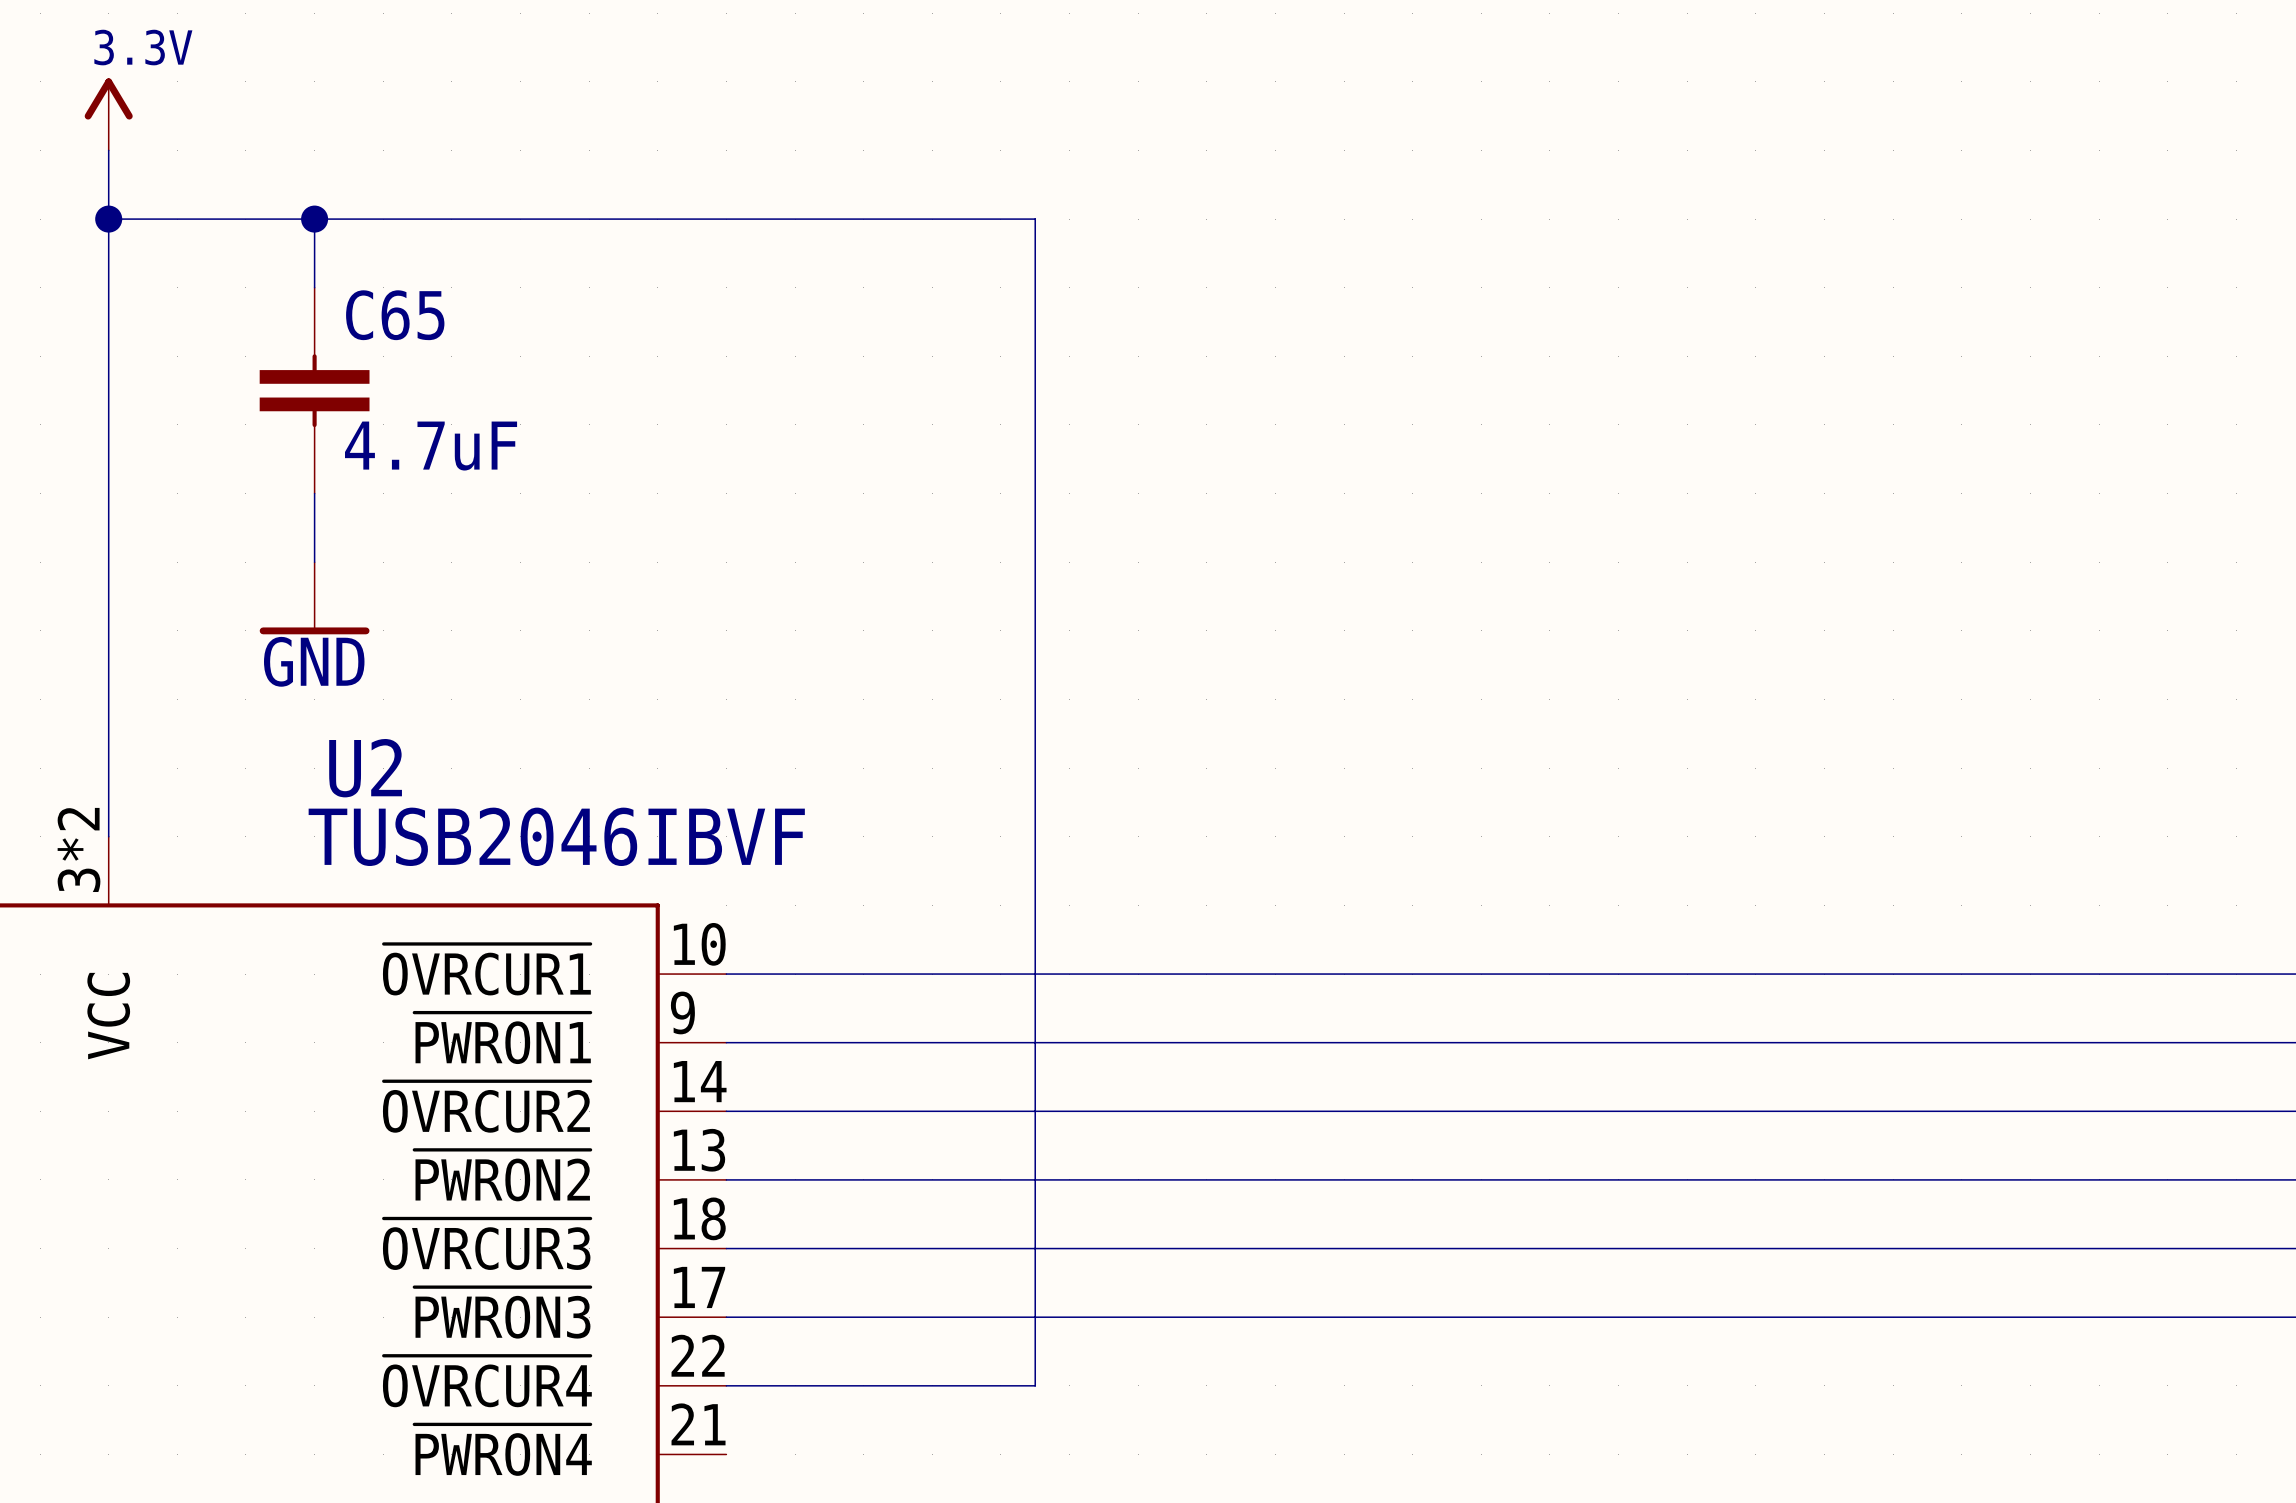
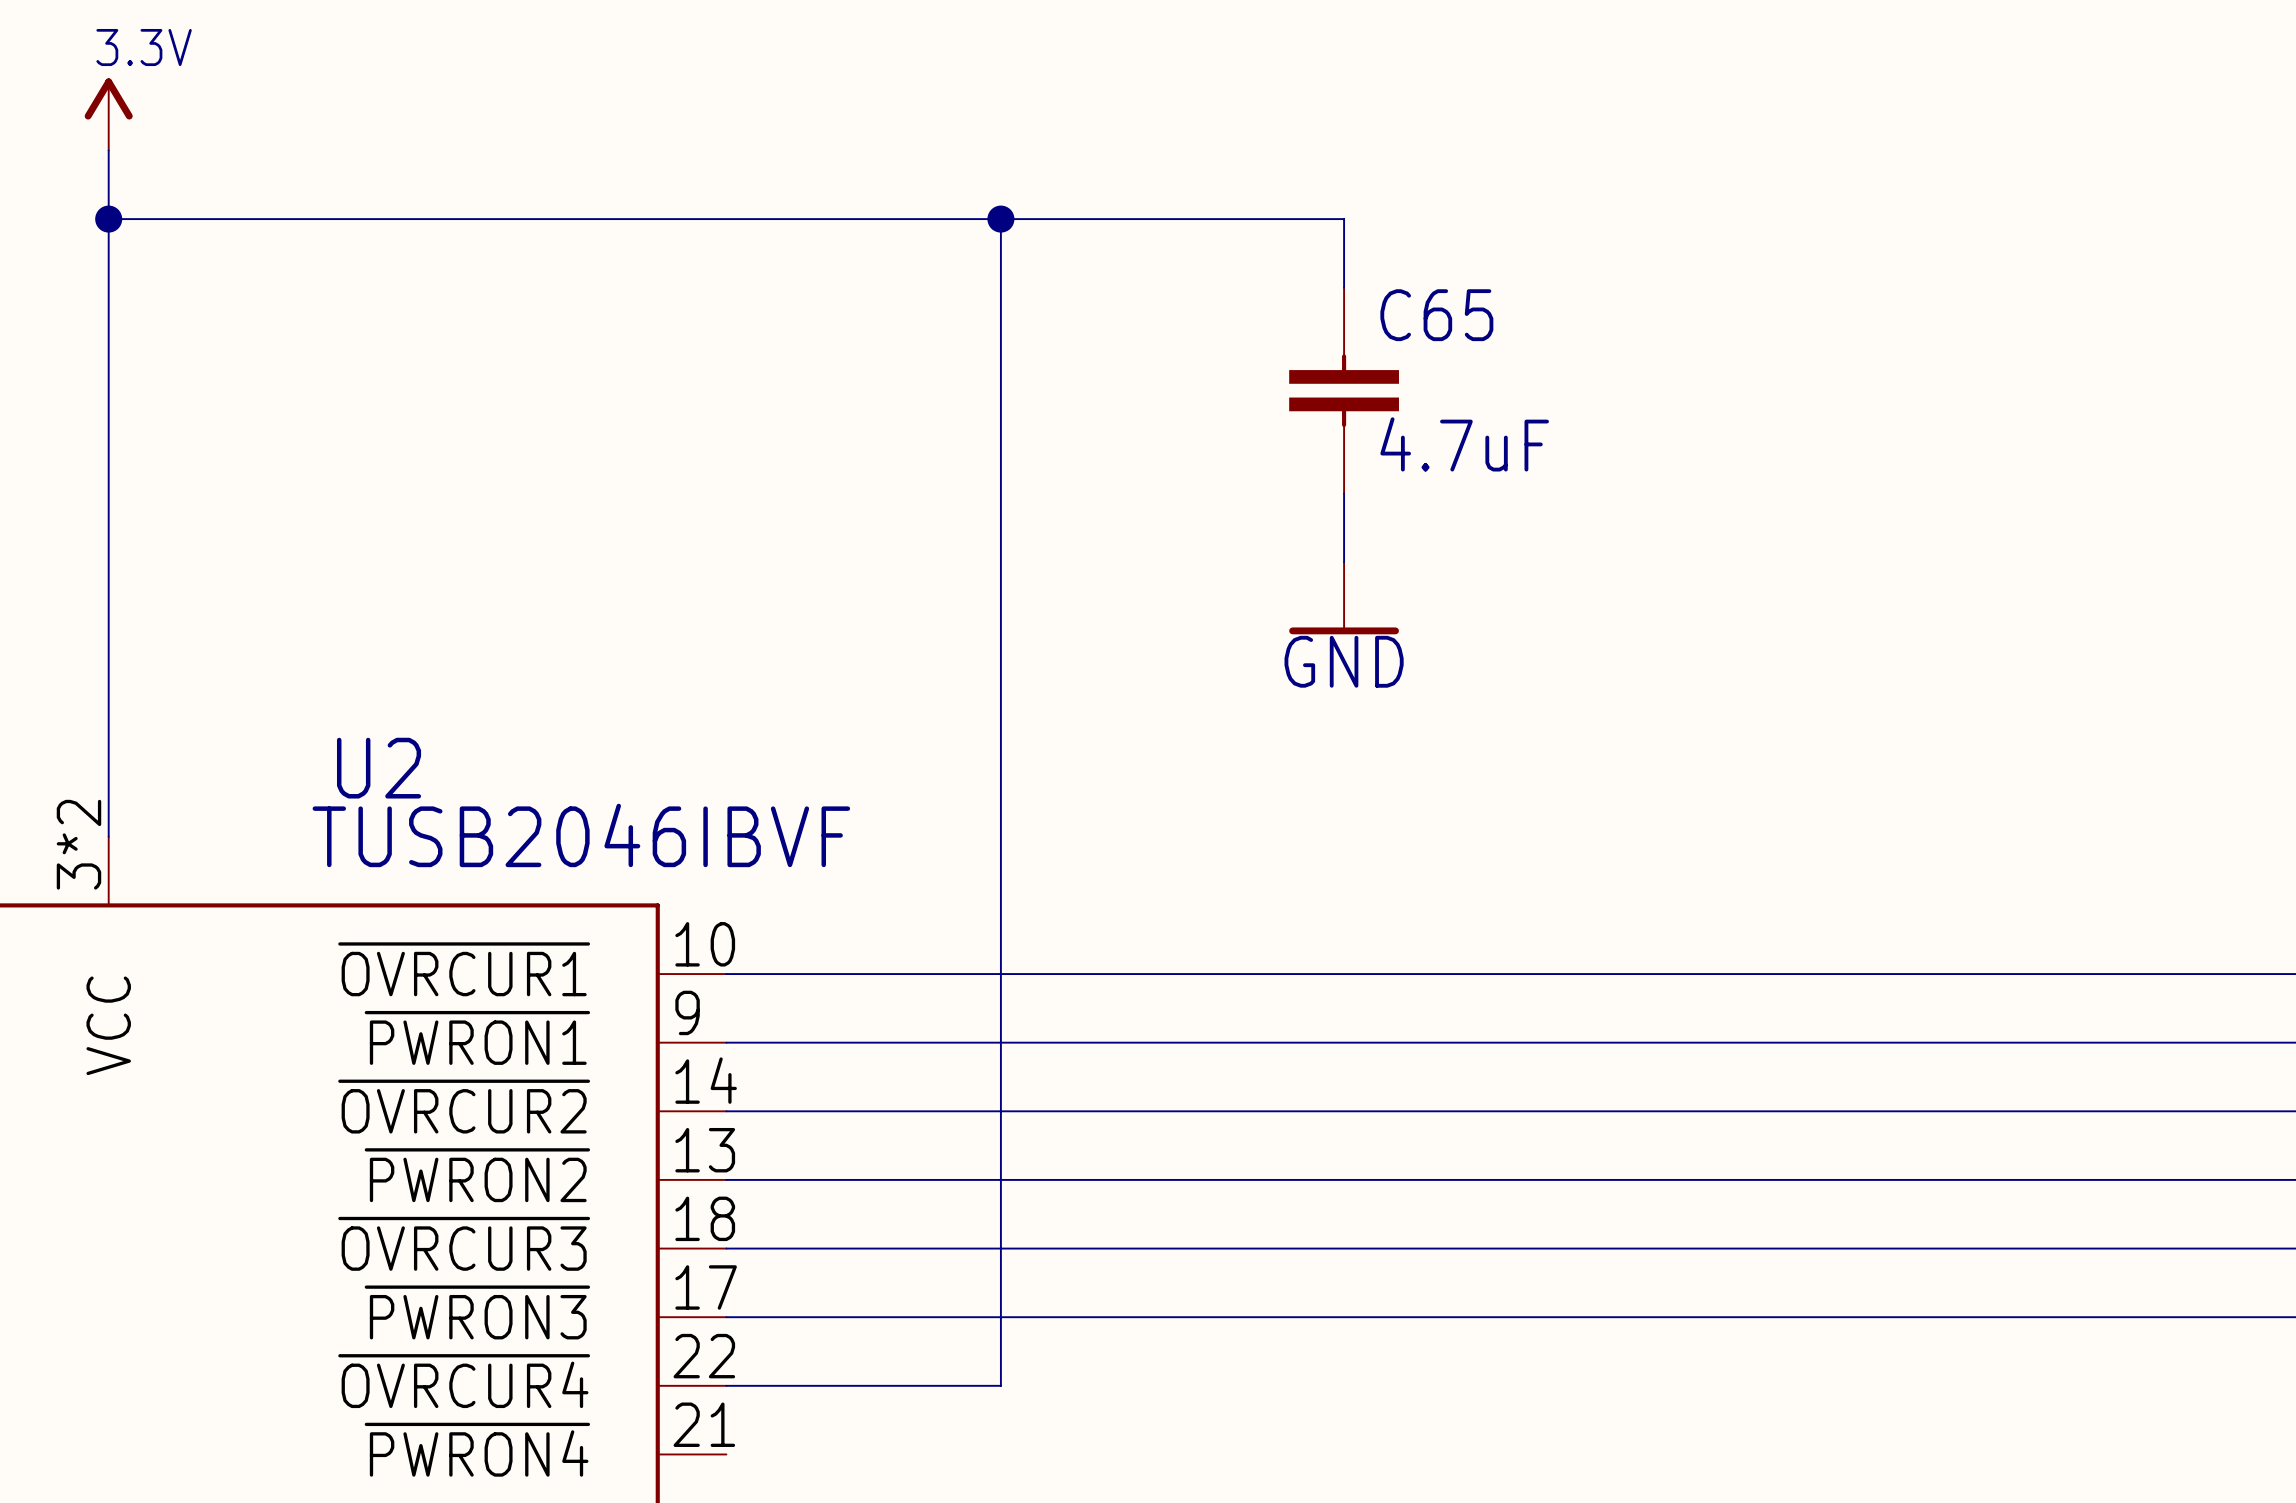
wire: (314, 219) (314, 287) -> none
junction: (314, 219) -> none
junction: none -> (1000, 219)
wire: (1035, 219) (1035, 1385) (1000, 1385) -> (1000, 219) (1000, 1385)
wire: none -> (1035, 219) (1344, 219) (1344, 287)
C65 position: (314, 390) -> (1344, 390)
wire: (314, 493) (314, 562) -> none
wire: none -> (1344, 493) (1344, 562)
power symbol: GND (314, 598) -> none
power symbol: none -> GND (1344, 598)

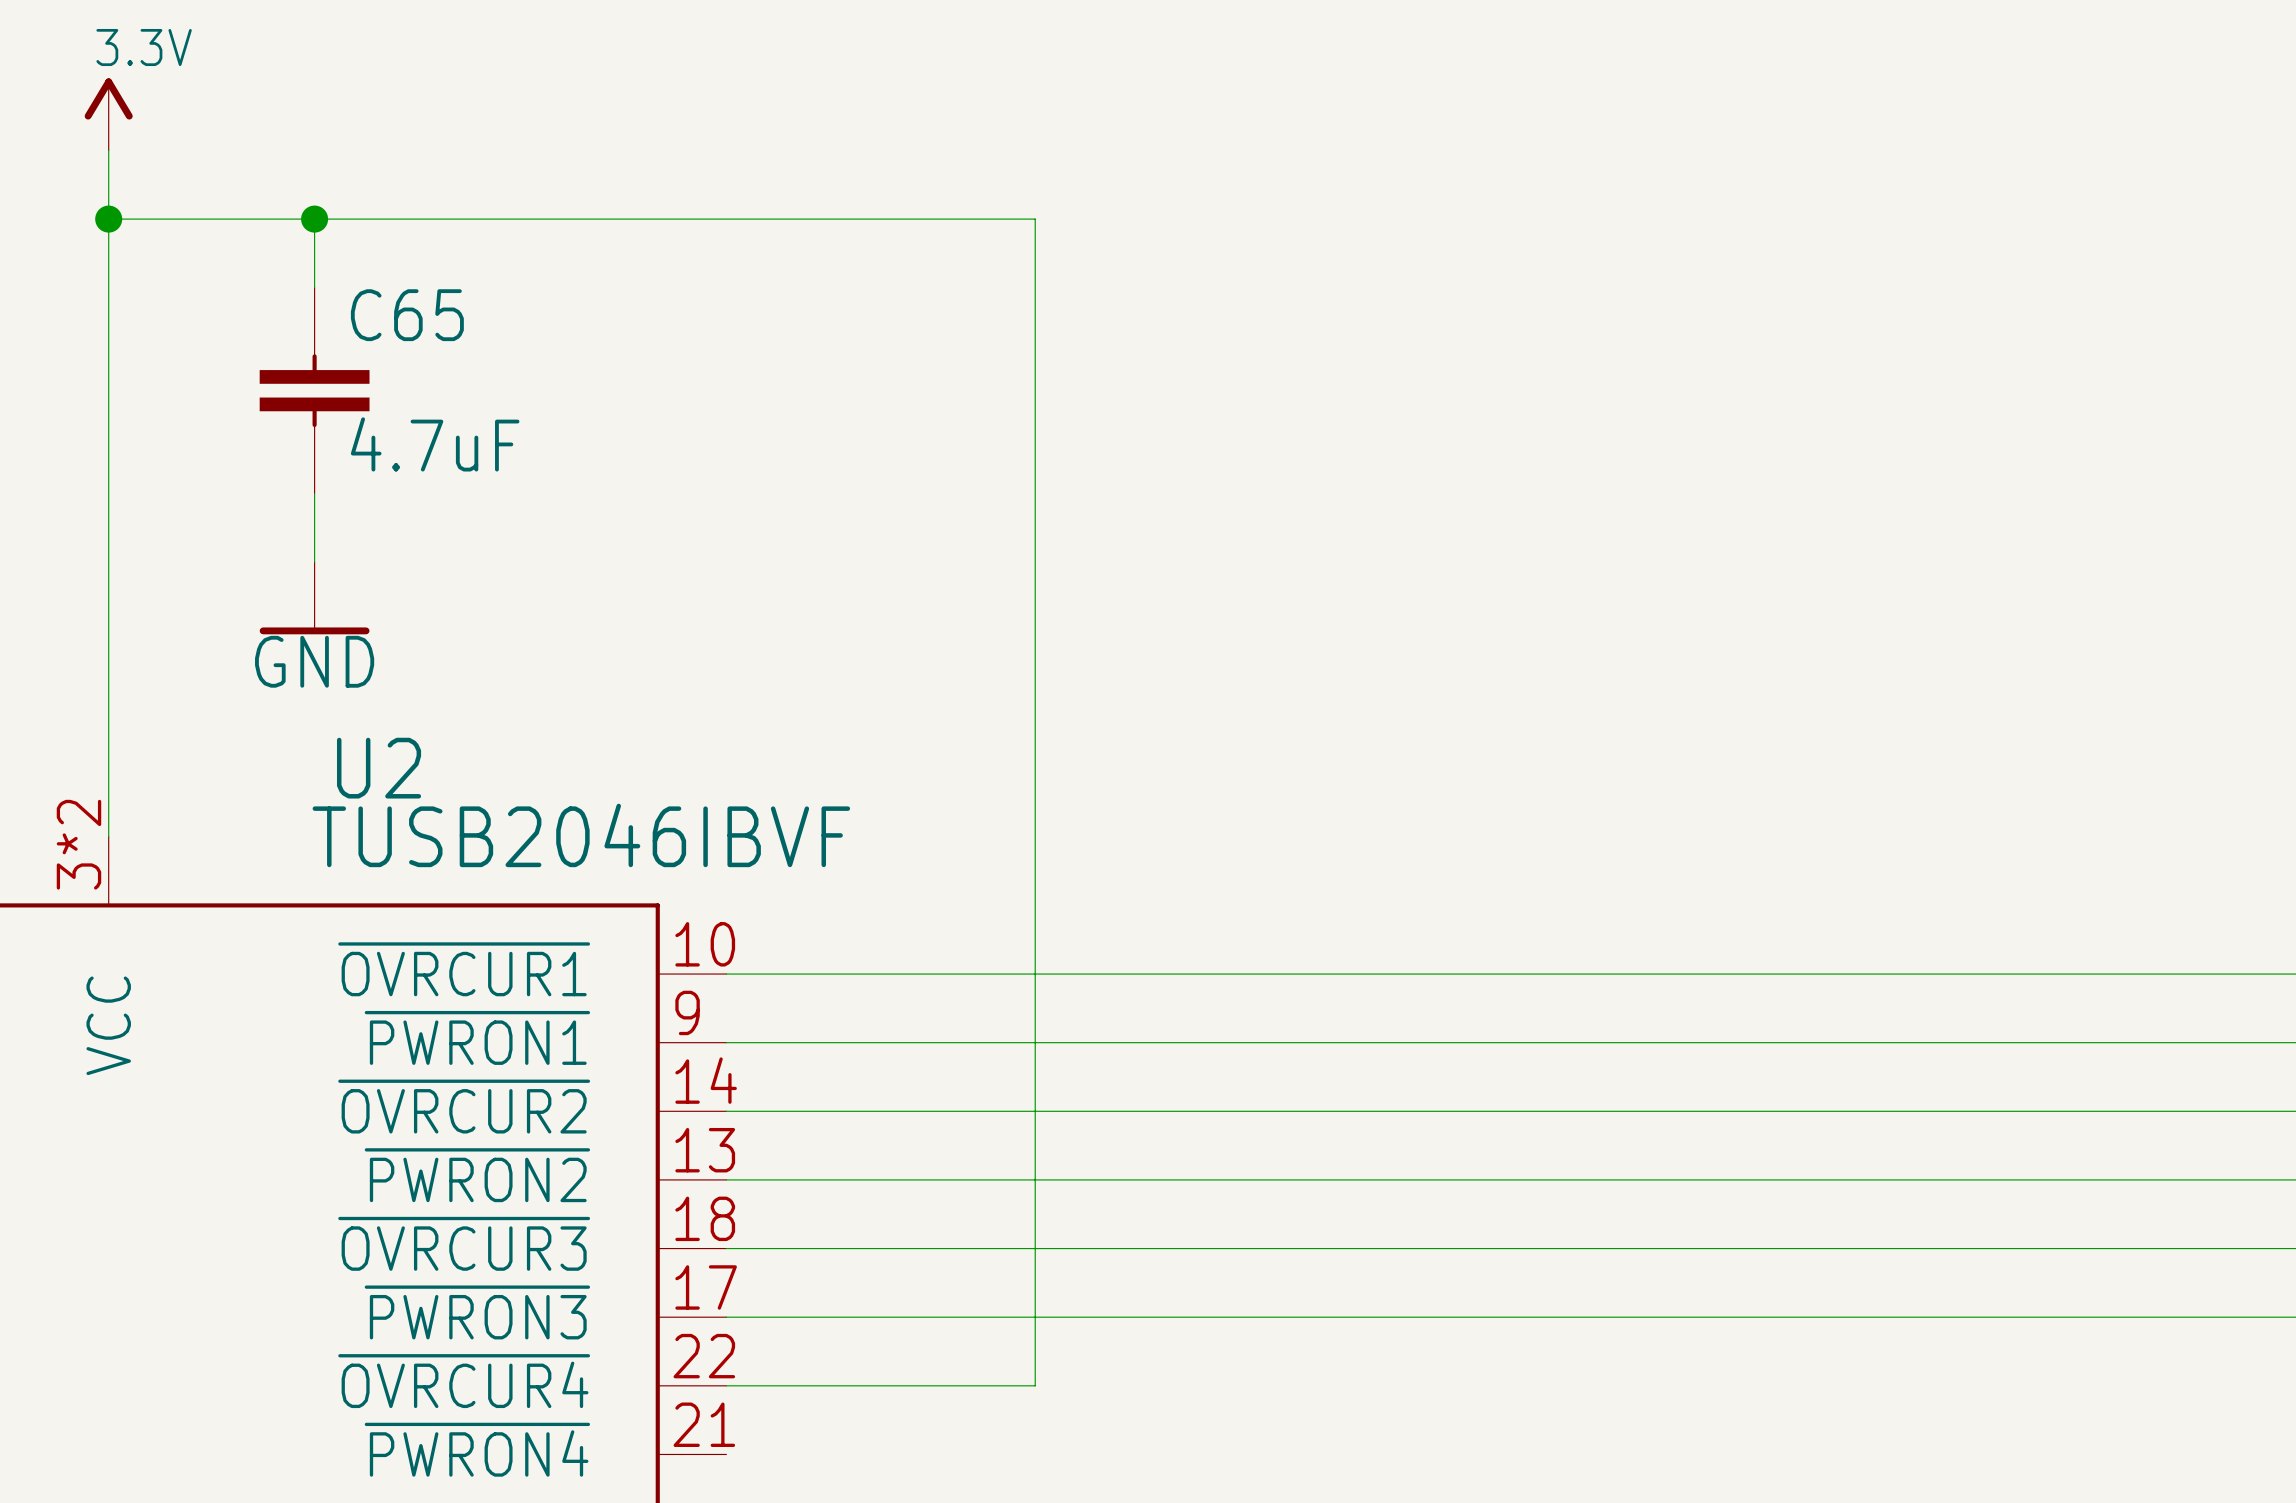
wire: none -> (314, 219) (314, 287)
junction: none -> (314, 219)
wire: (1000, 219) (1000, 1385) -> (1035, 219) (1035, 1385) (1000, 1385)
junction: (1000, 219) -> none
wire: (1035, 219) (1344, 219) (1344, 287) -> none
C65 position: (1344, 390) -> (314, 390)
wire: none -> (314, 493) (314, 562)
wire: (1344, 493) (1344, 562) -> none
power symbol: none -> GND (314, 598)
power symbol: GND (1344, 598) -> none

